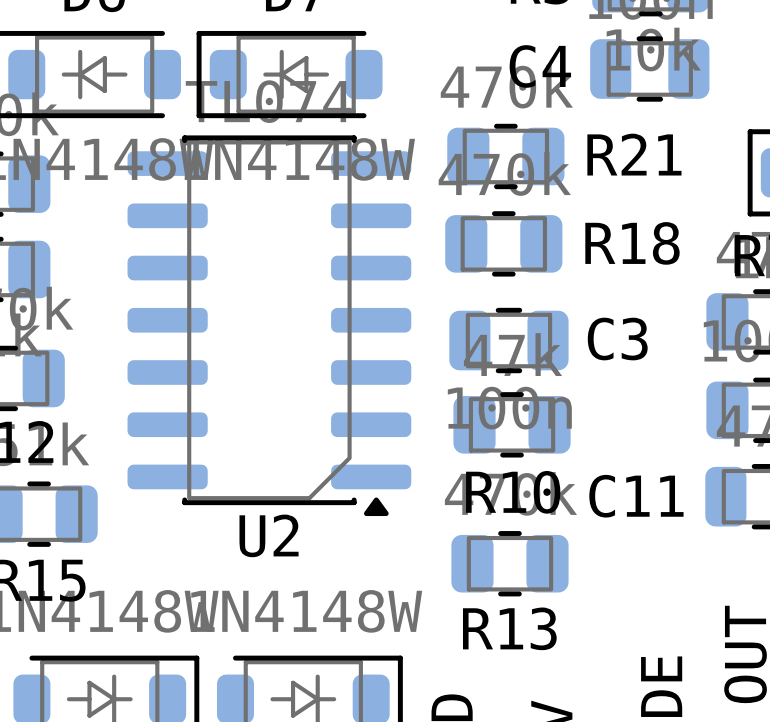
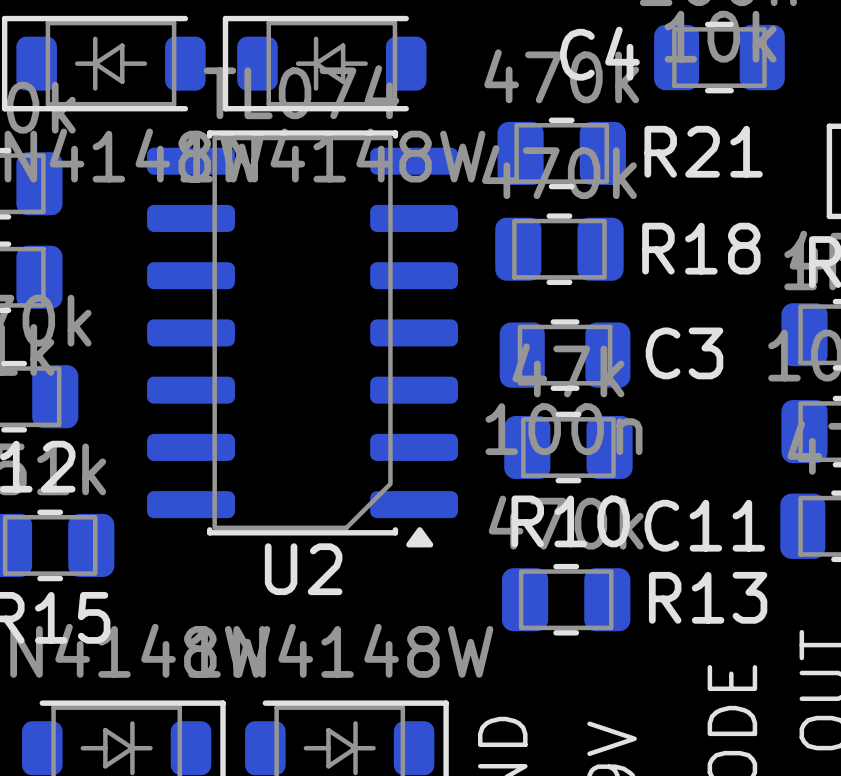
R13 name position: R13 (509, 628) -> R13 (708, 597)

